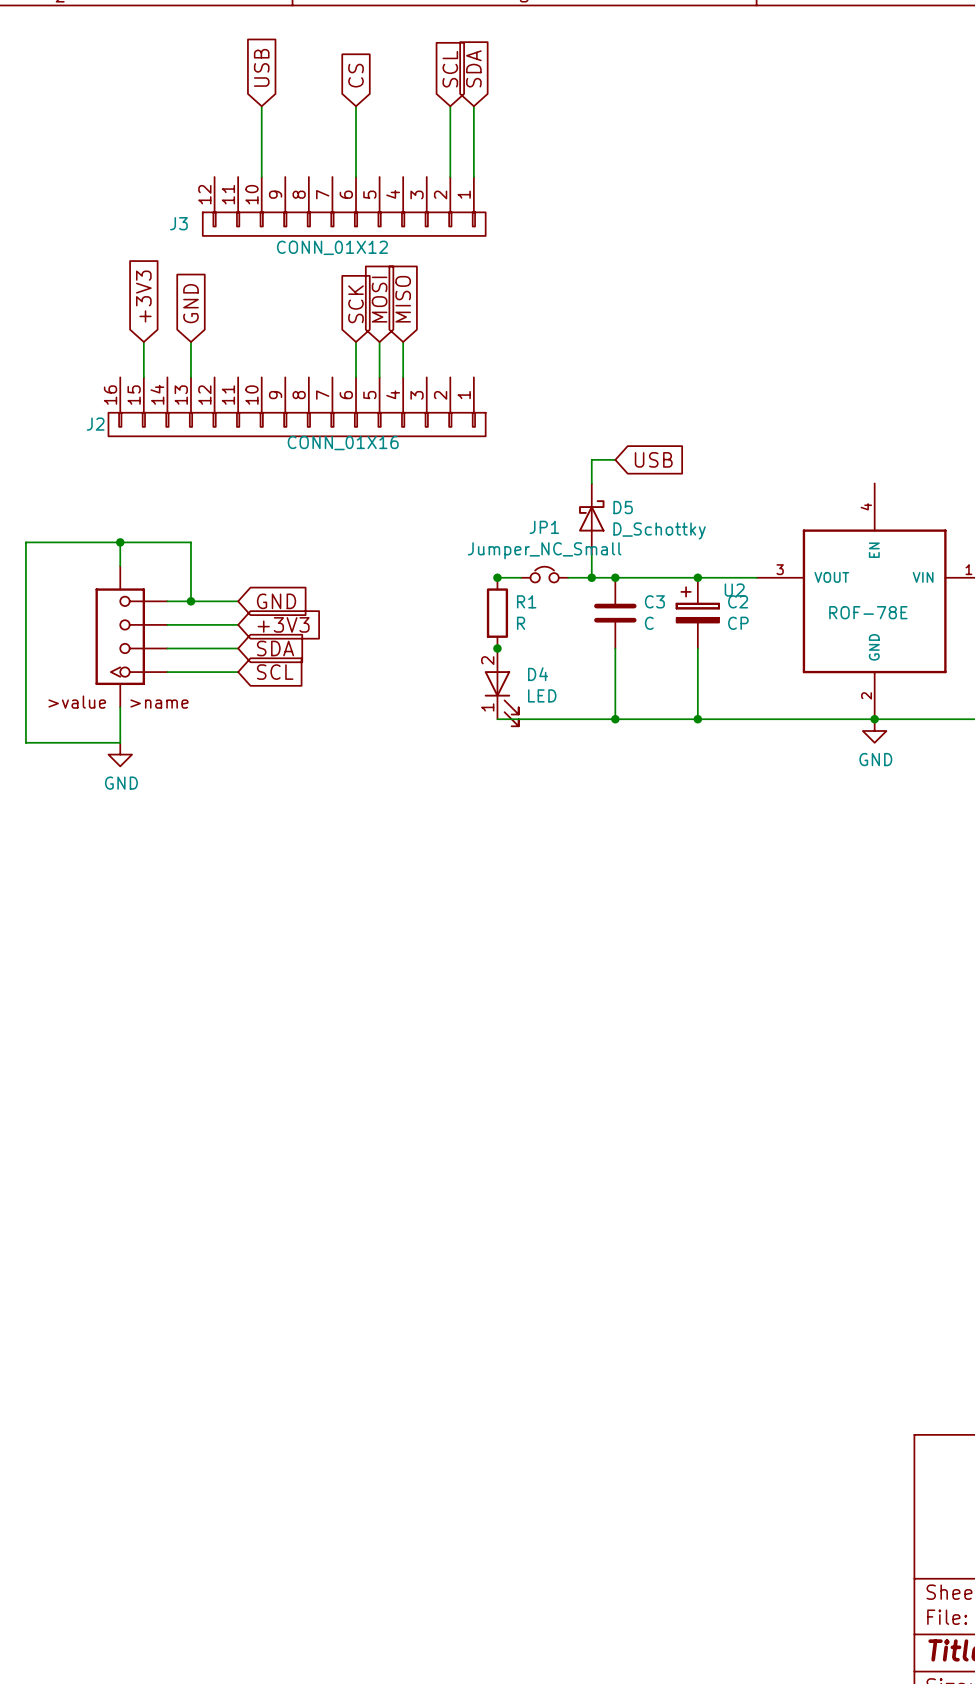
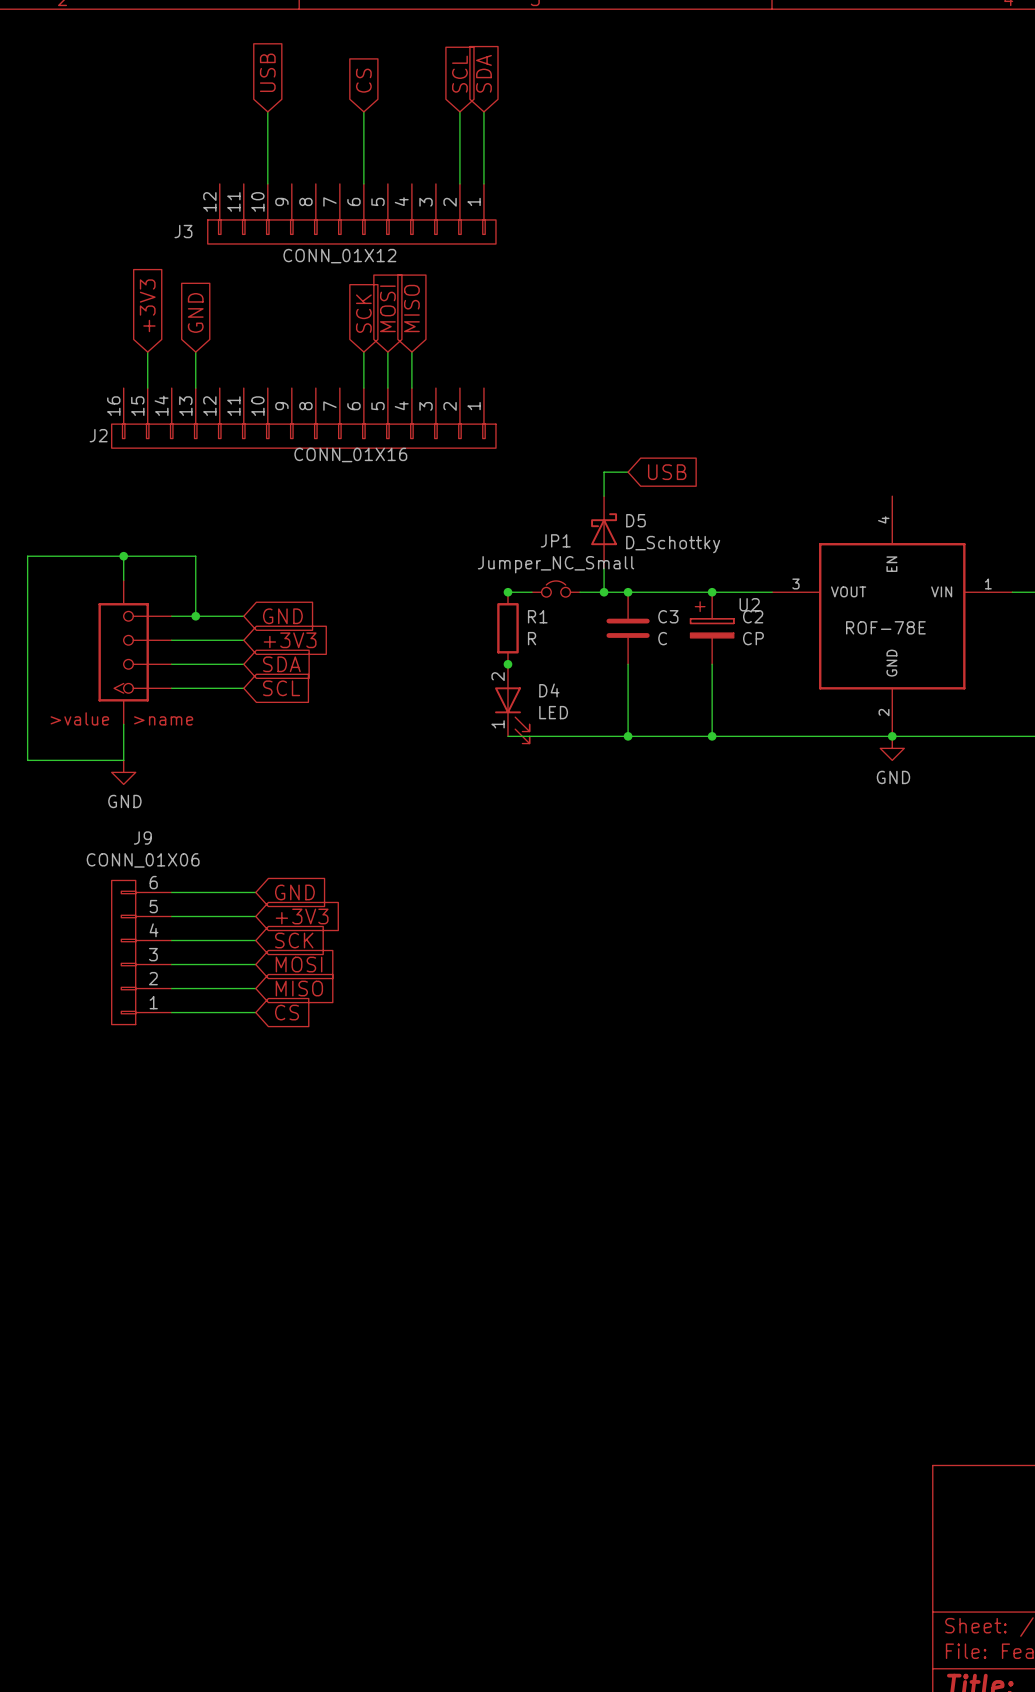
wire: none -> (171, 892) (255, 892)
global label: none -> GND (294, 892)
wire: none -> (171, 916) (255, 916)
global label: none -> +3V3 (302, 916)
wire: none -> (171, 940) (255, 940)
global label: none -> SCK (294, 940)
J9: none -> CONN_01X06 (141, 952)
wire: none -> (171, 964) (255, 964)
global label: none -> MOSI (299, 964)
wire: none -> (171, 988) (255, 988)
global label: none -> MISO (299, 988)
wire: none -> (171, 1012) (255, 1012)
global label: none -> CS (287, 1012)

